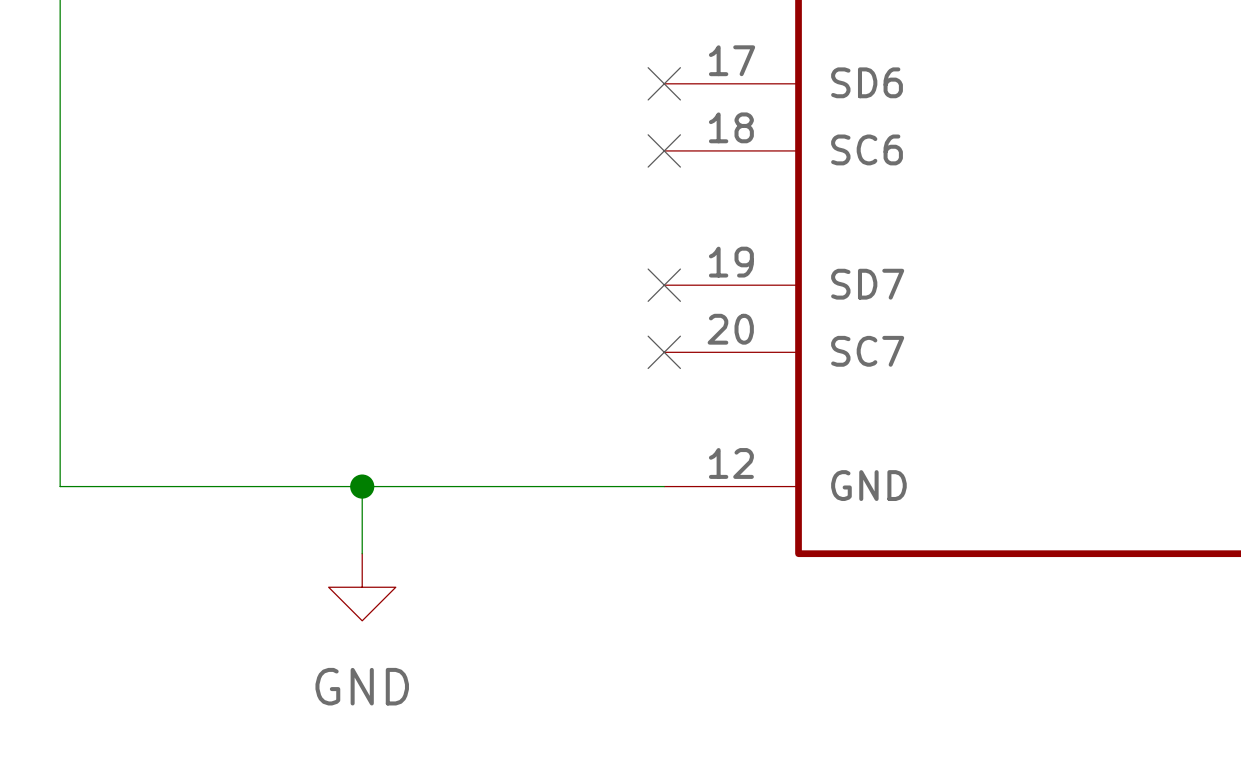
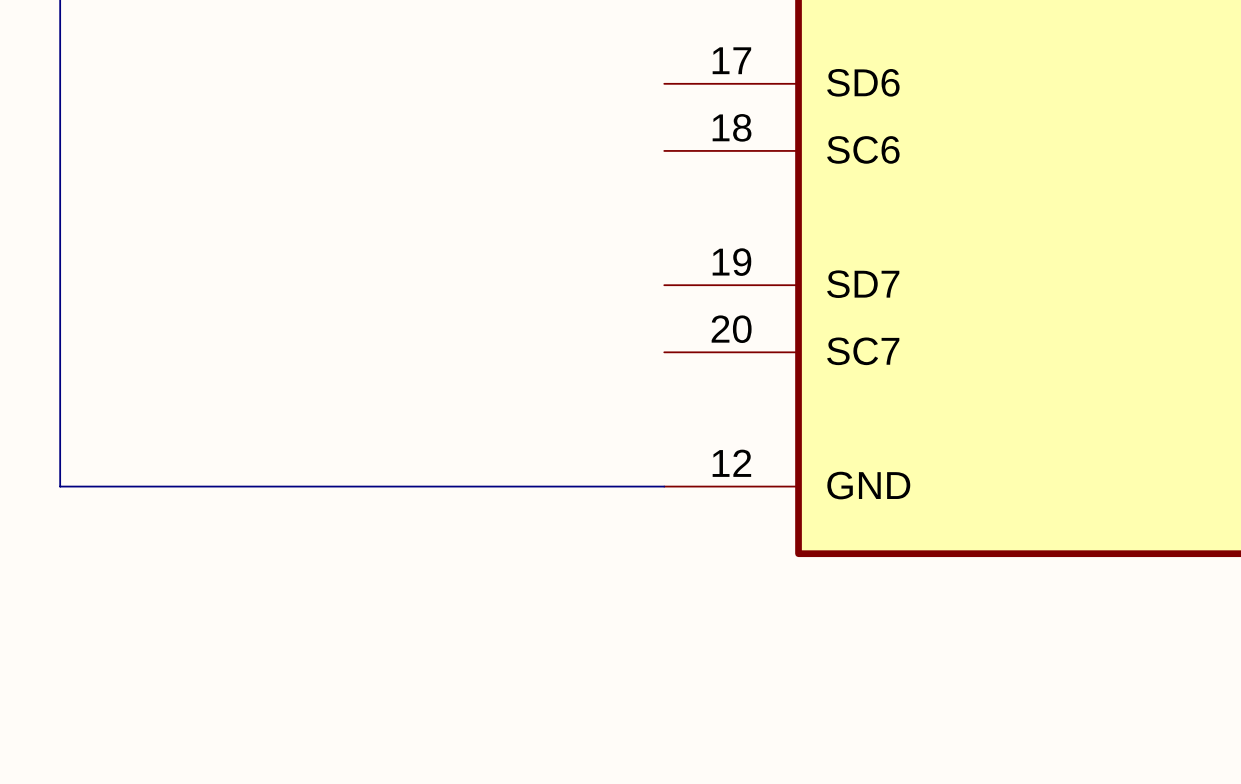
no-connect mark: (664, 83) -> none
no-connect mark: (664, 150) -> none
no-connect mark: (664, 285) -> none
no-connect mark: (664, 352) -> none
wire: (362, 486) (362, 553) -> none
junction: (362, 486) -> none
power symbol: GND (362, 587) -> none

